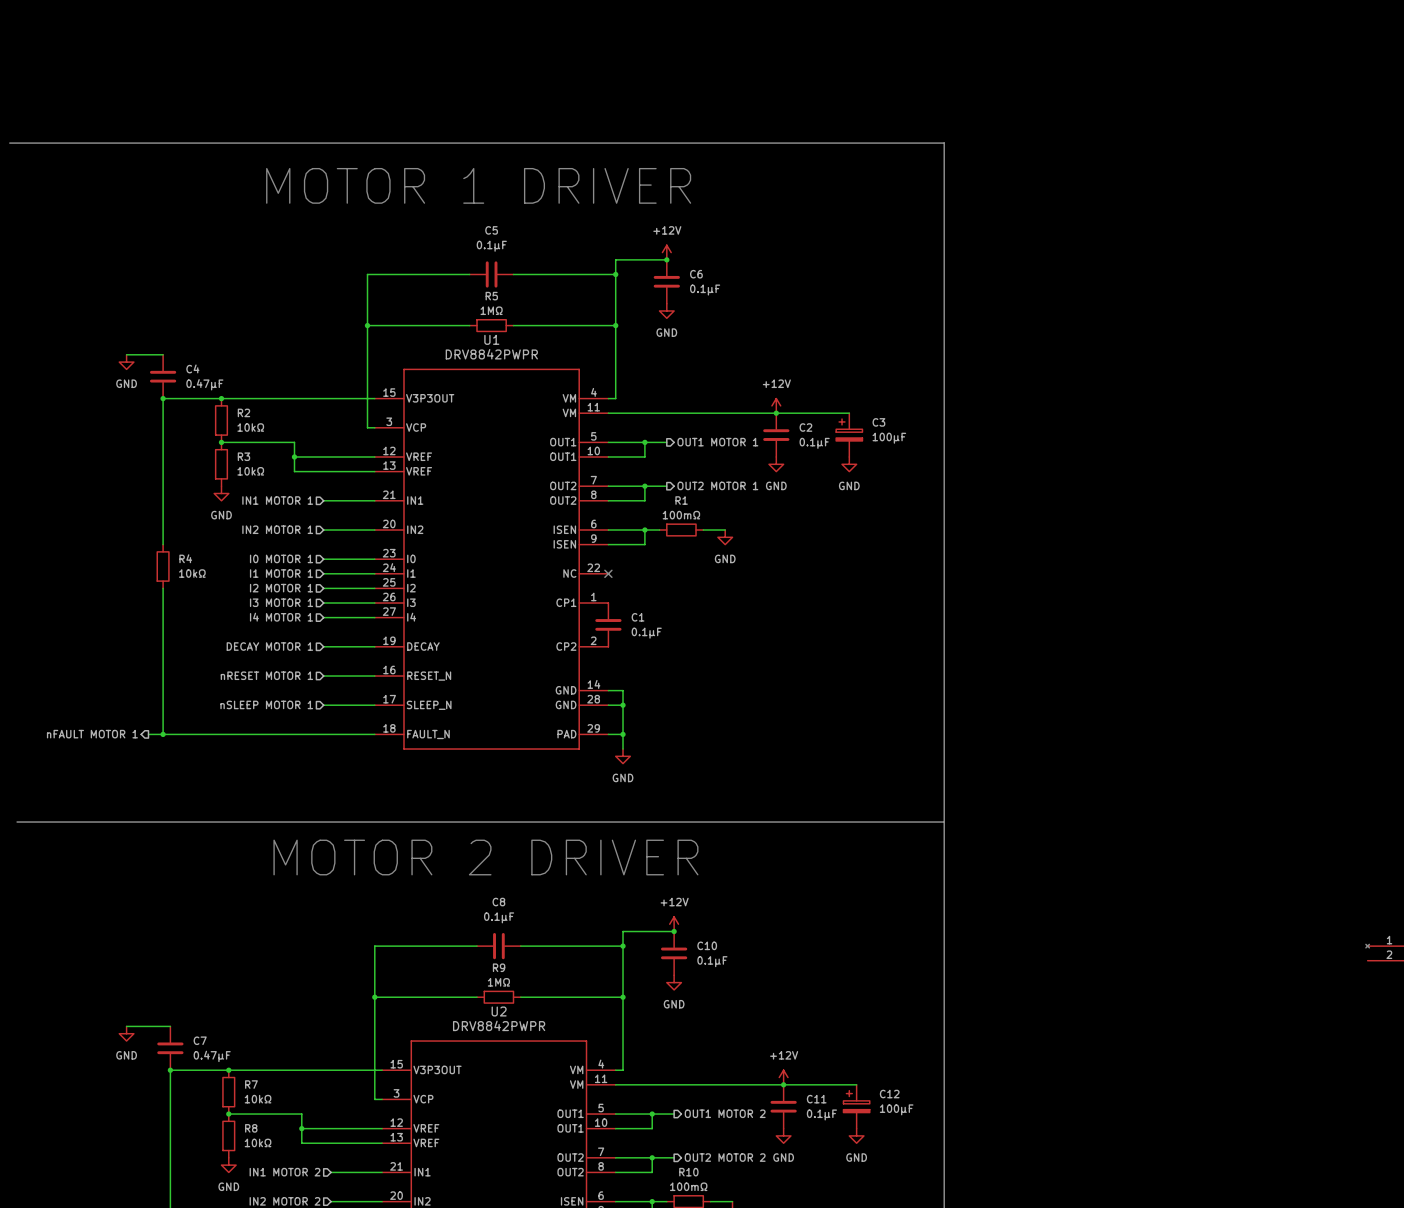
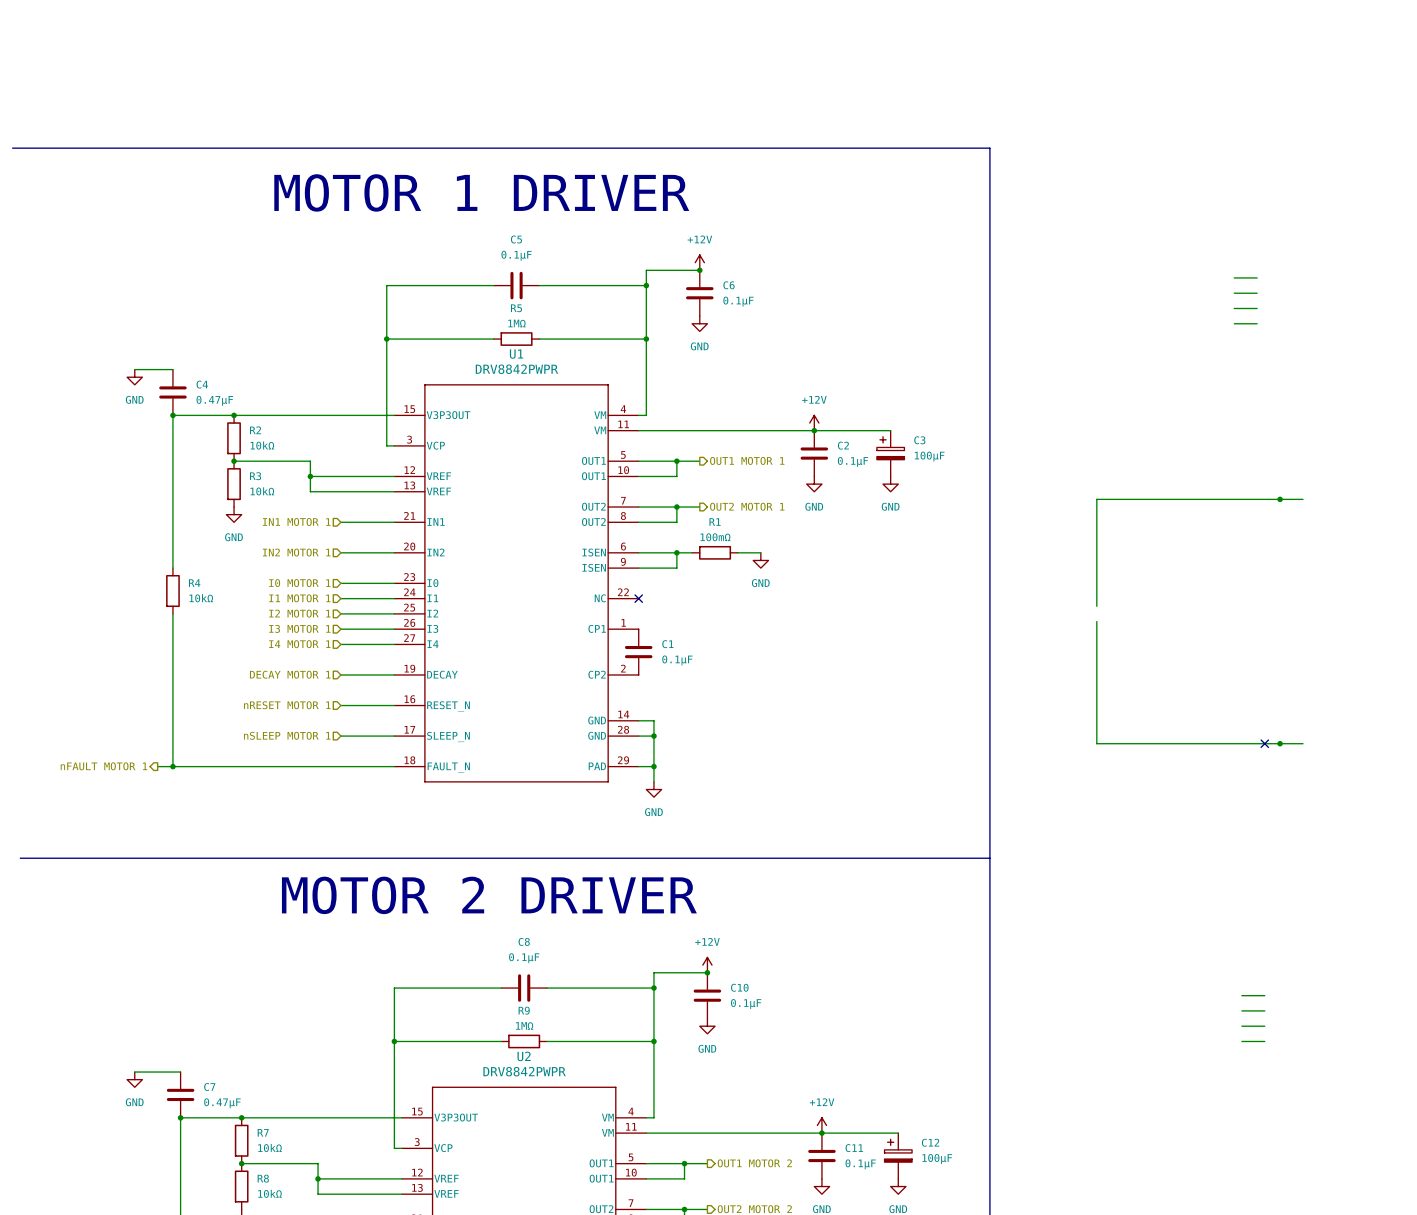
wire: none -> (1234, 277) (1257, 277)
wire: none -> (1234, 293) (1257, 293)
wire: none -> (1234, 308) (1257, 308)
wire: none -> (1234, 323) (1257, 323)
junction: none -> (1280, 499)
wire: none -> (1302, 499) (1096, 499) (1096, 606)
wire: none -> (1096, 621) (1096, 743) (1302, 743)
no-connect mark: none -> (1264, 743)
junction: none -> (1280, 743)
wire: none -> (1241, 995) (1264, 995)
wire: none -> (1241, 1010) (1264, 1010)
wire: none -> (1241, 1026) (1264, 1026)
wire: none -> (1241, 1041) (1264, 1041)

